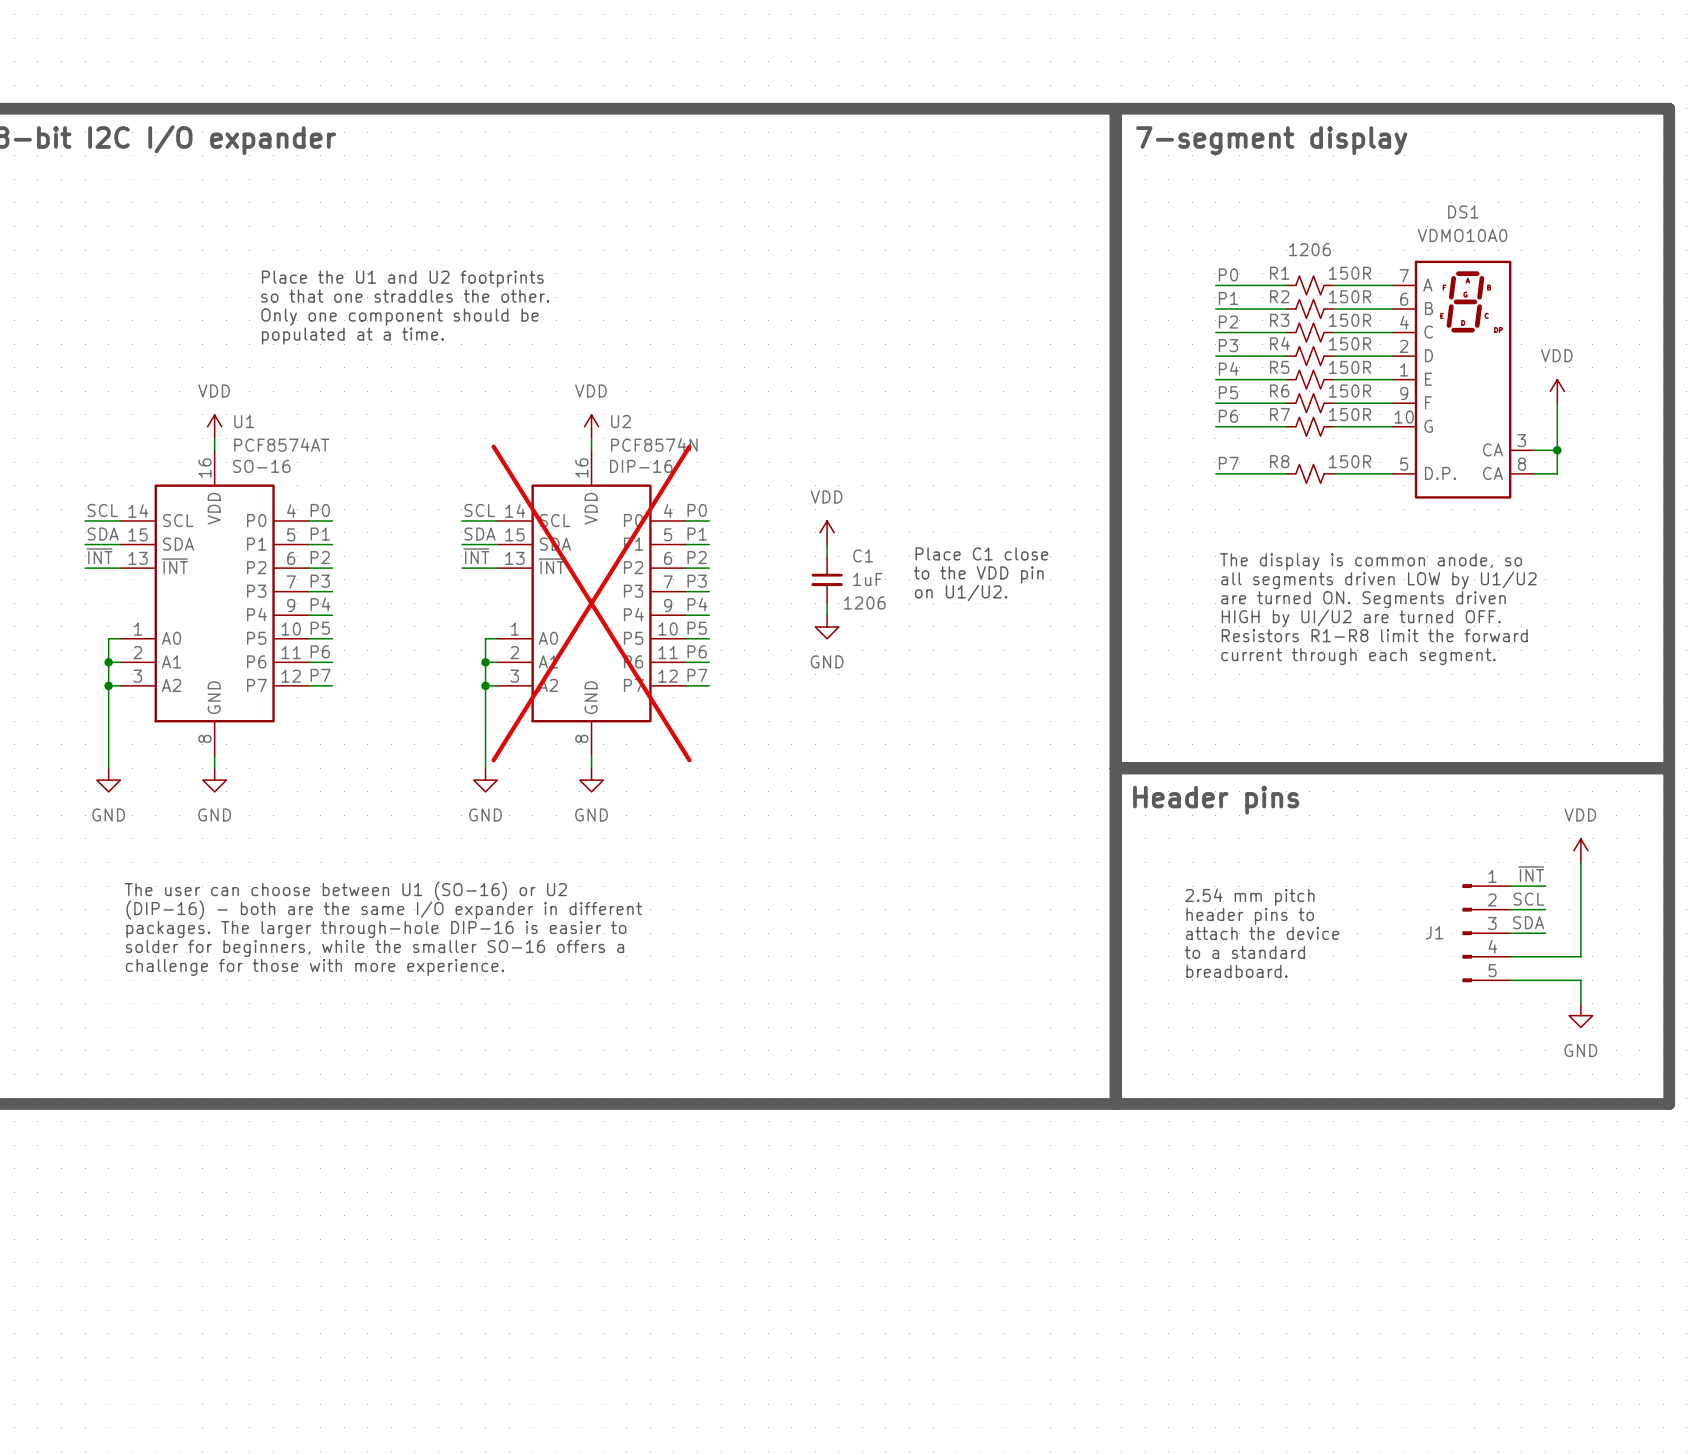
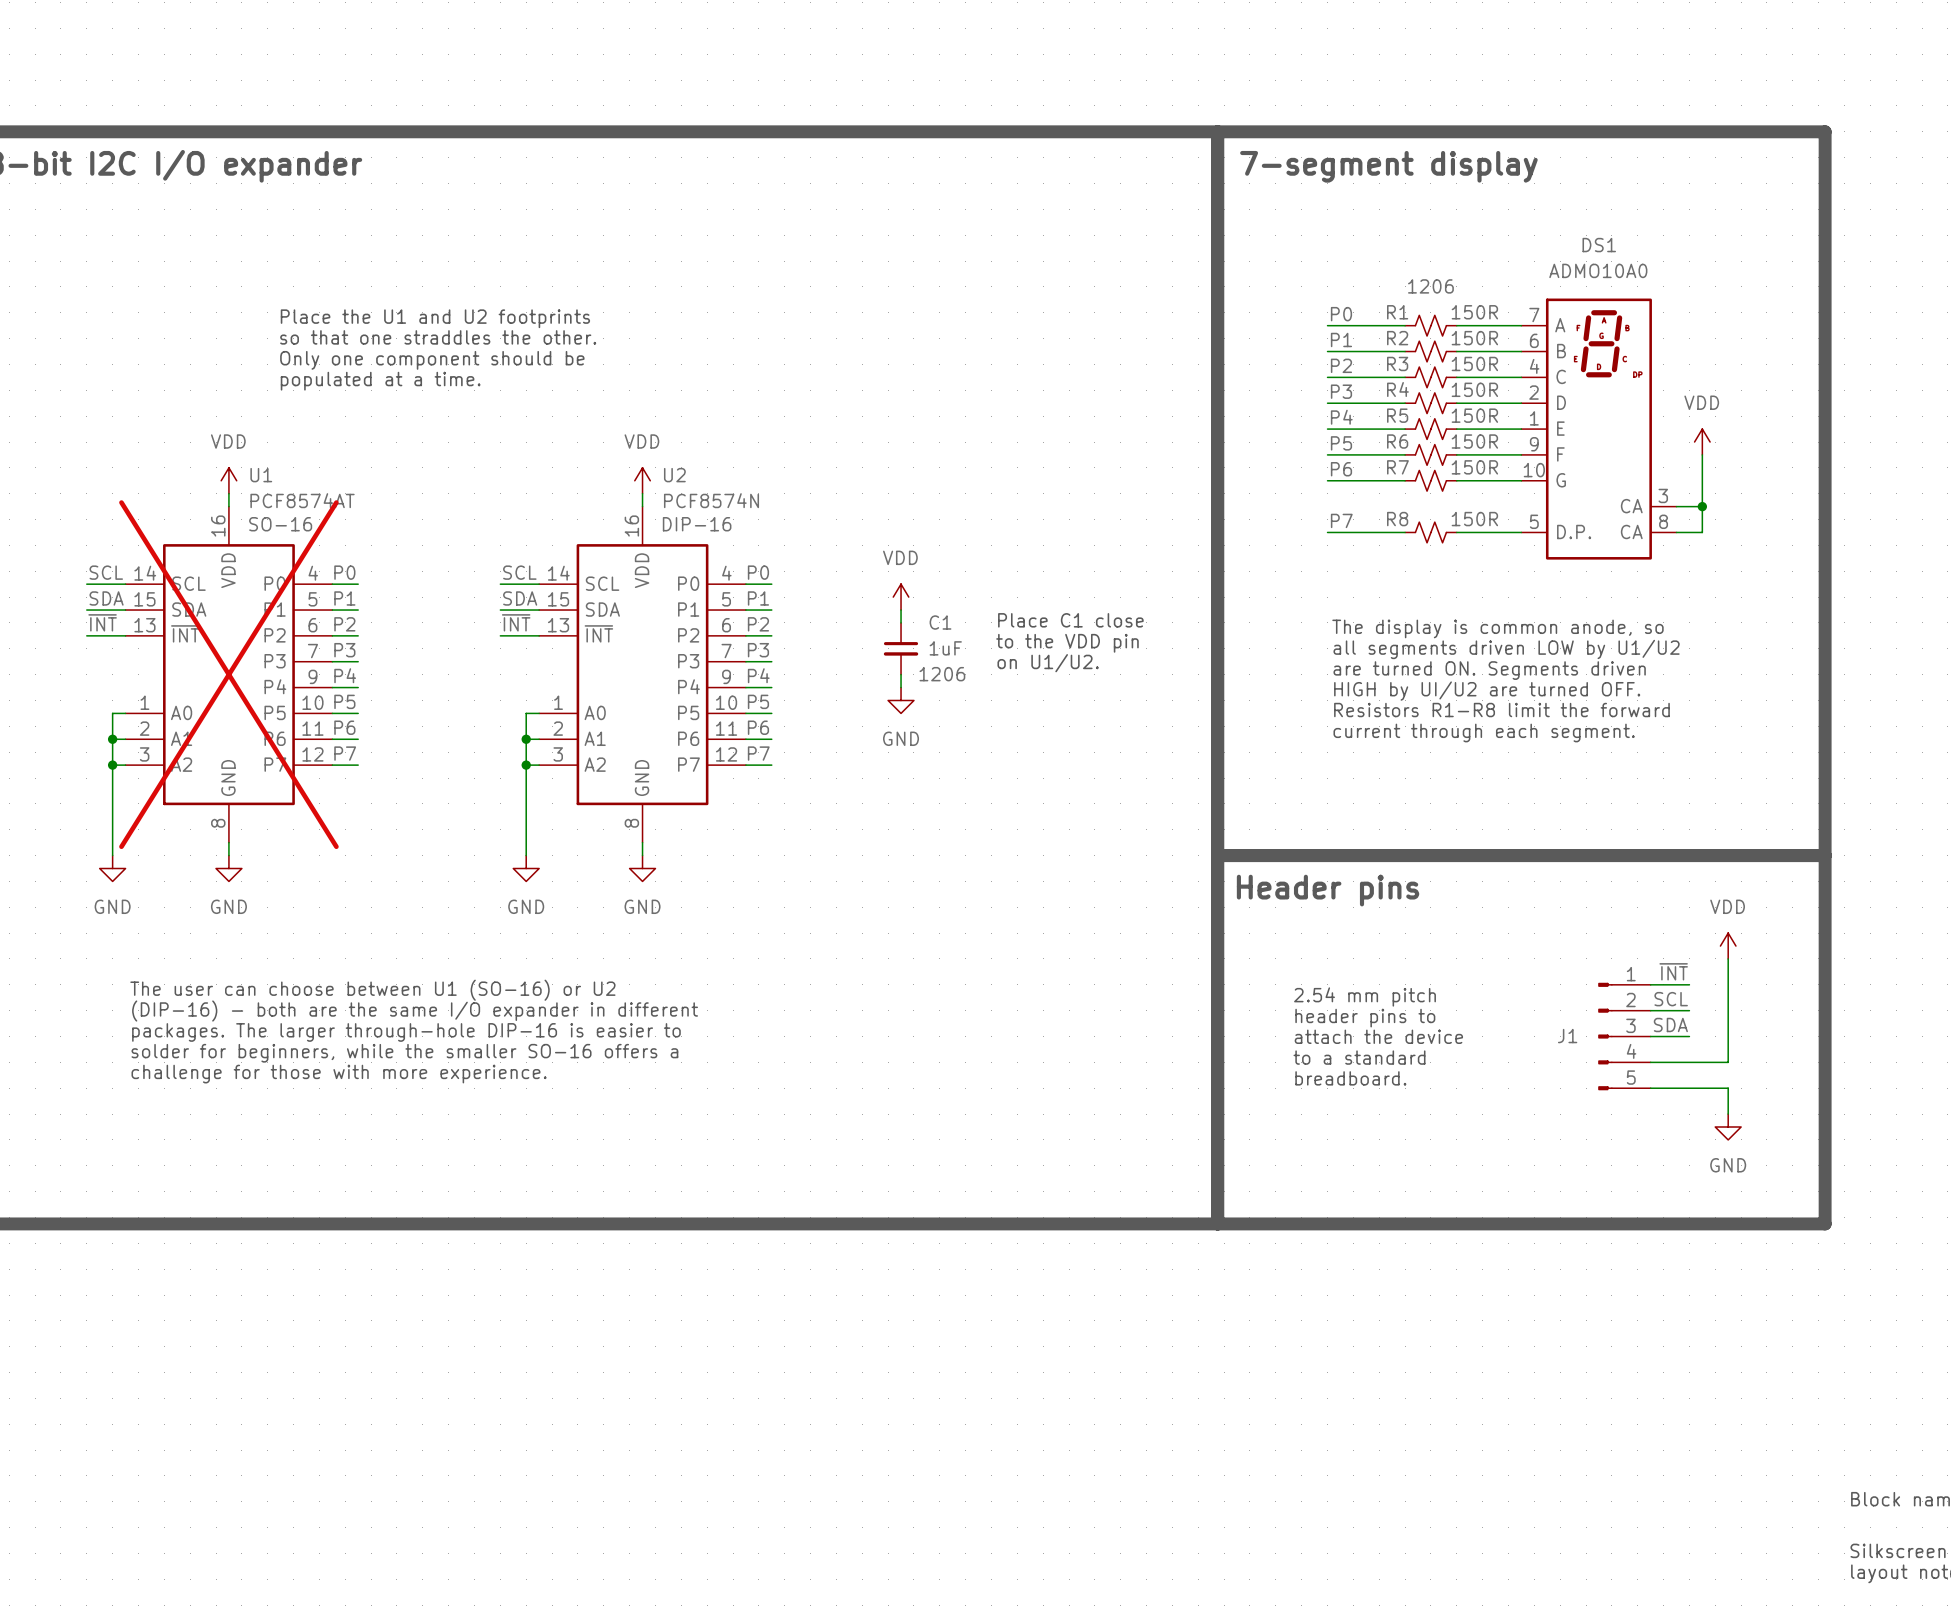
DS1 value: VDMO10A0 (1462, 235) -> ADMO10A0 (1598, 270)
U1 do-not-place cross: none -> (228, 674)
U2 do-not-place cross: (591, 603) -> none

